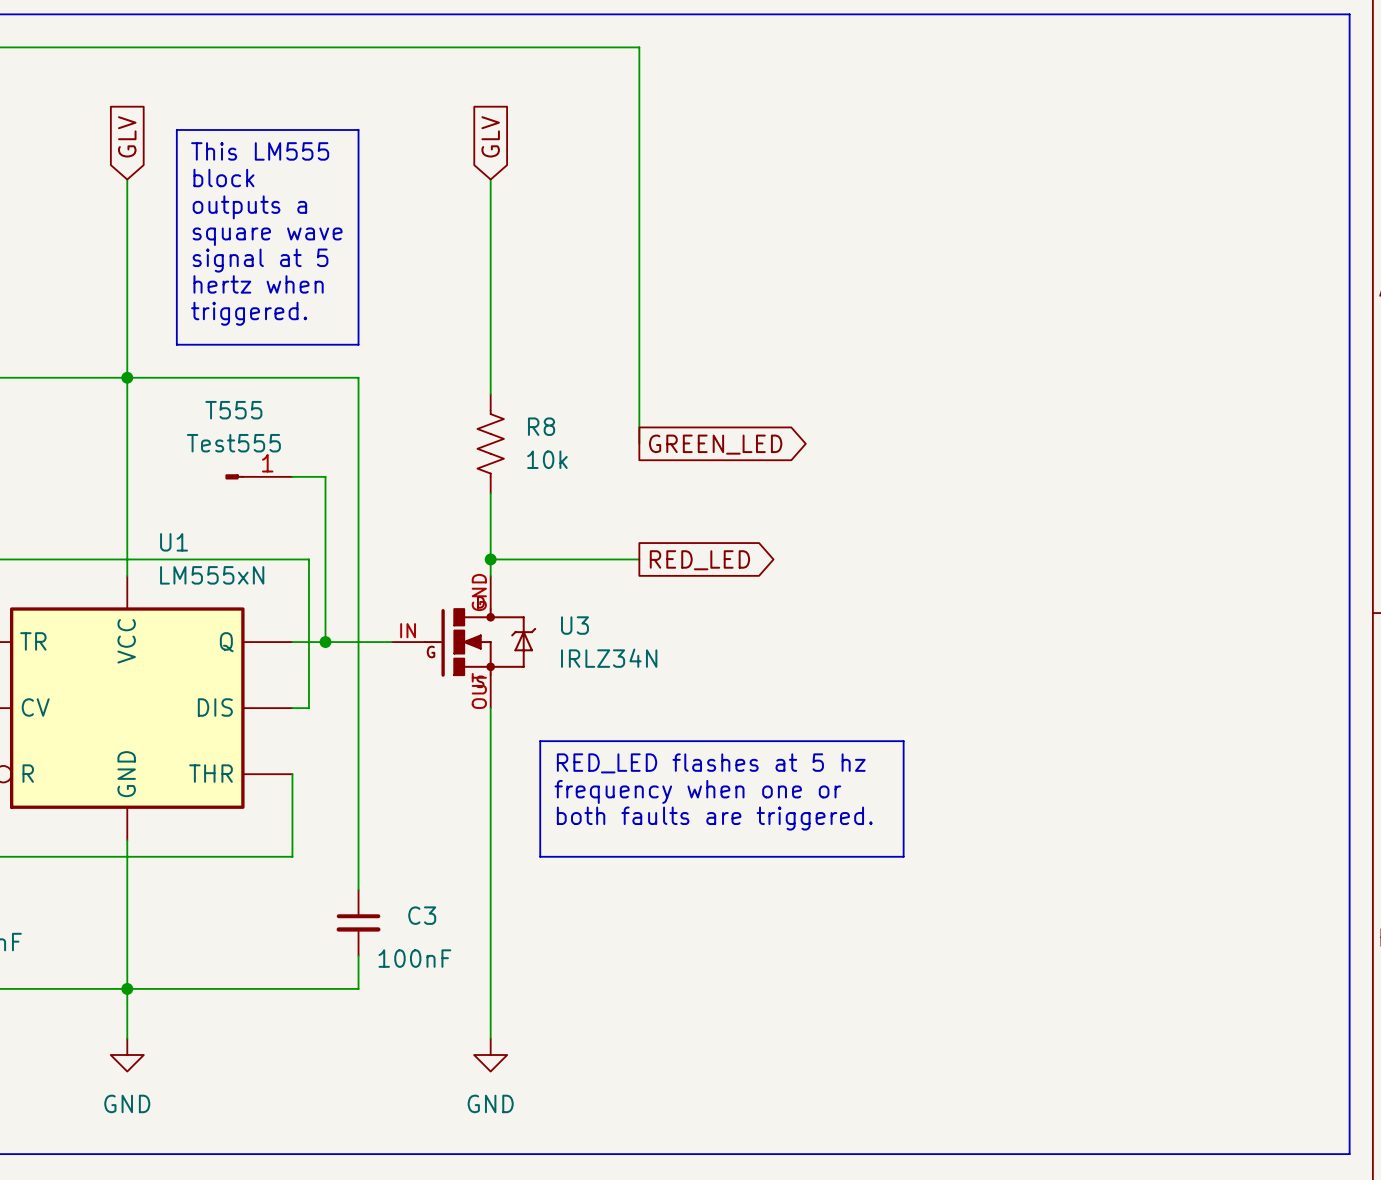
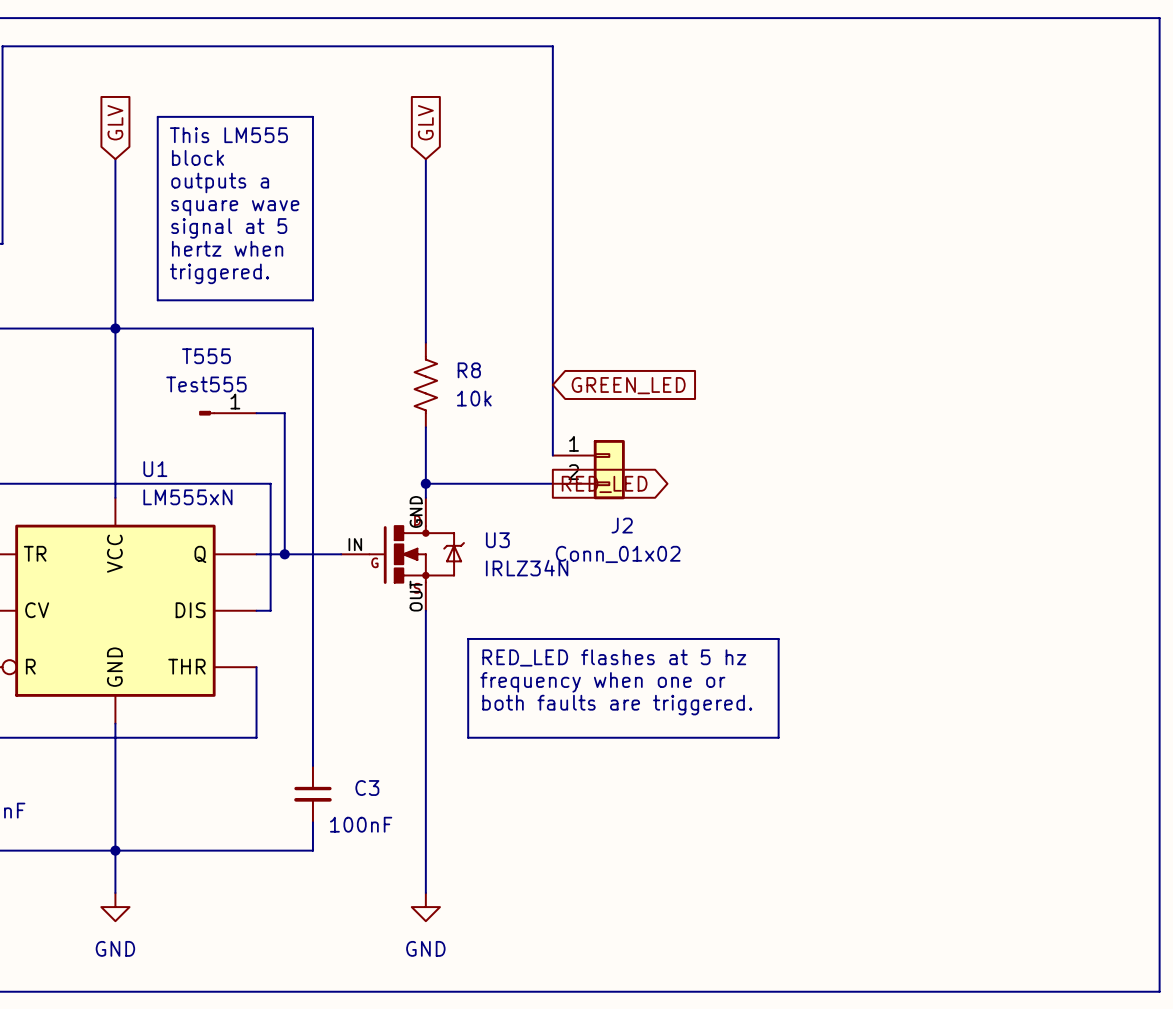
wire: none -> (552, 384) (552, 455)
global label shape: output (715, 444) -> input (628, 385)
J2: none -> Conn_01x02 (588, 469)

